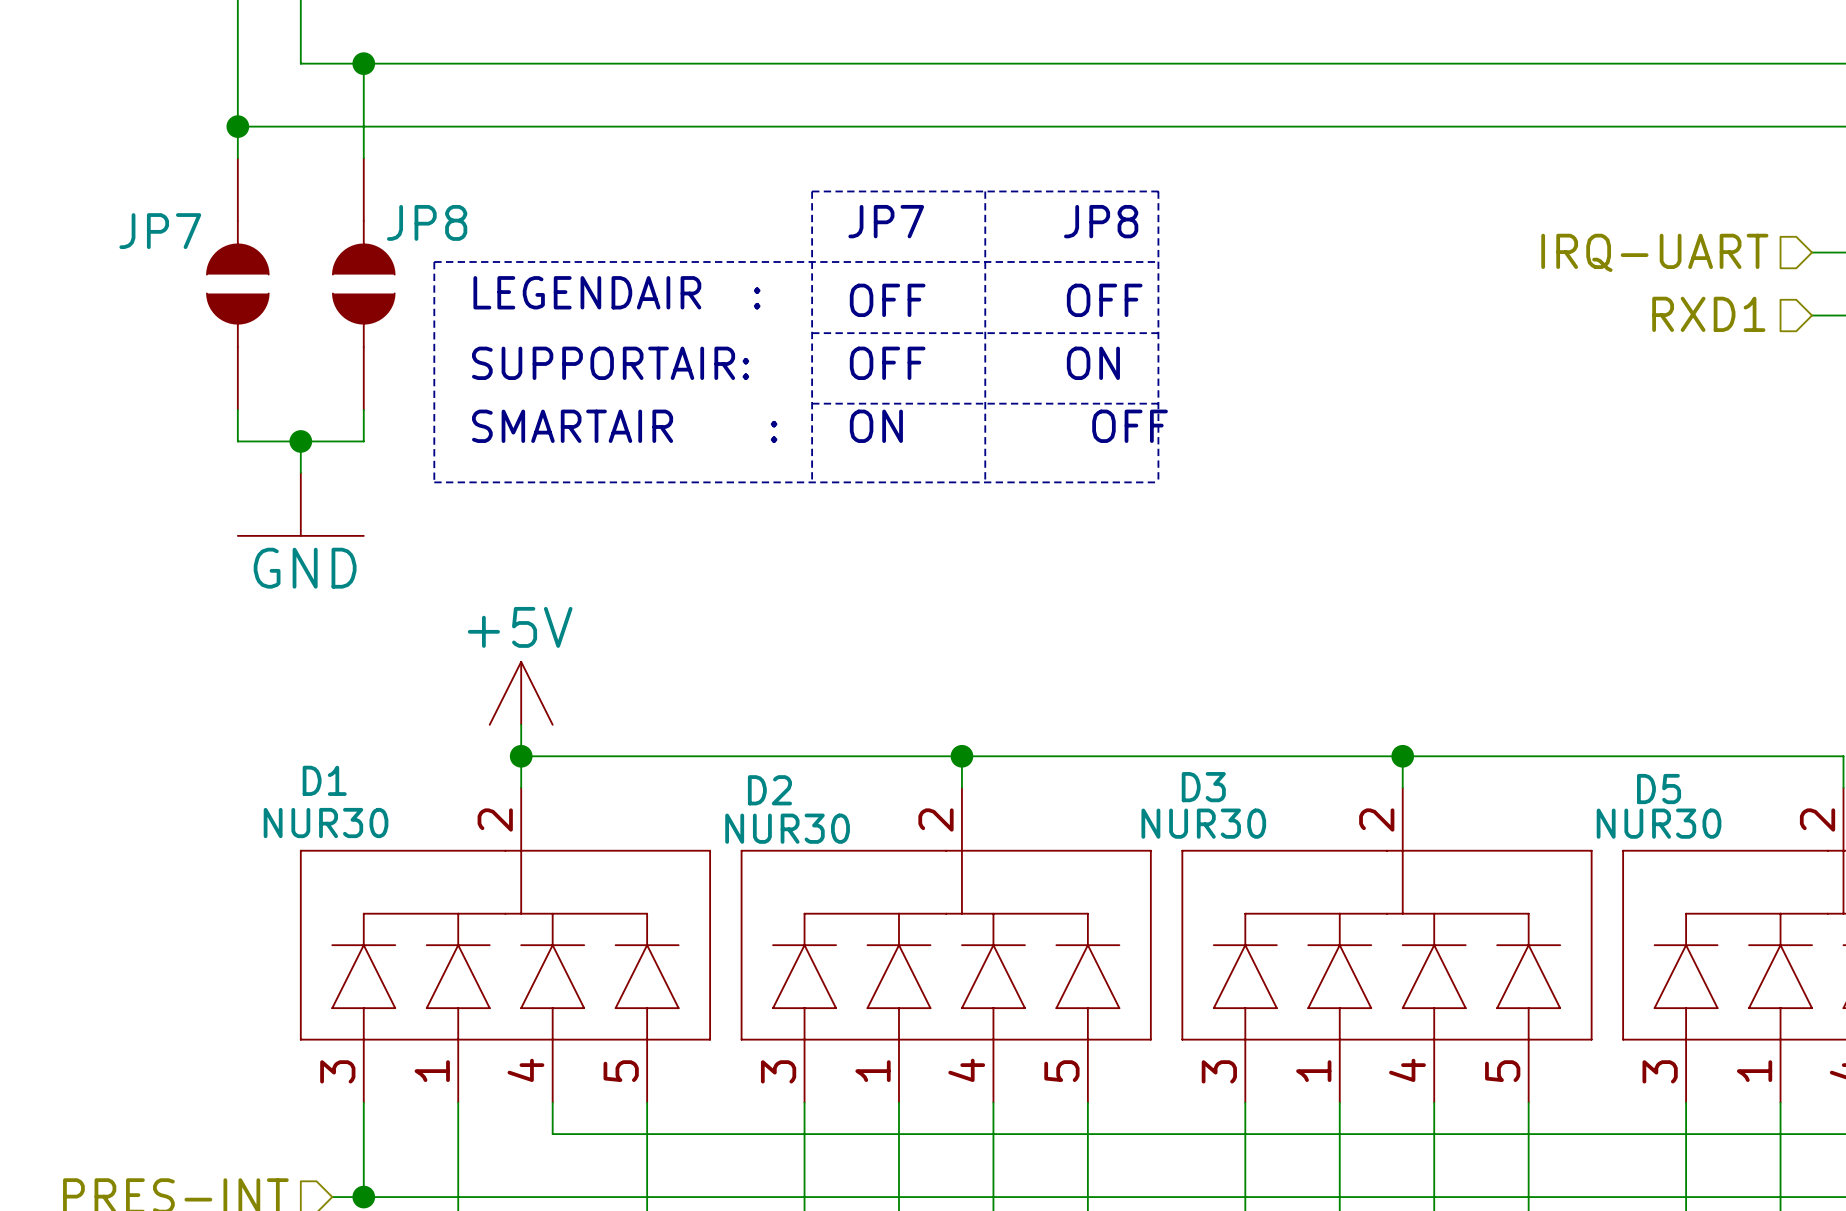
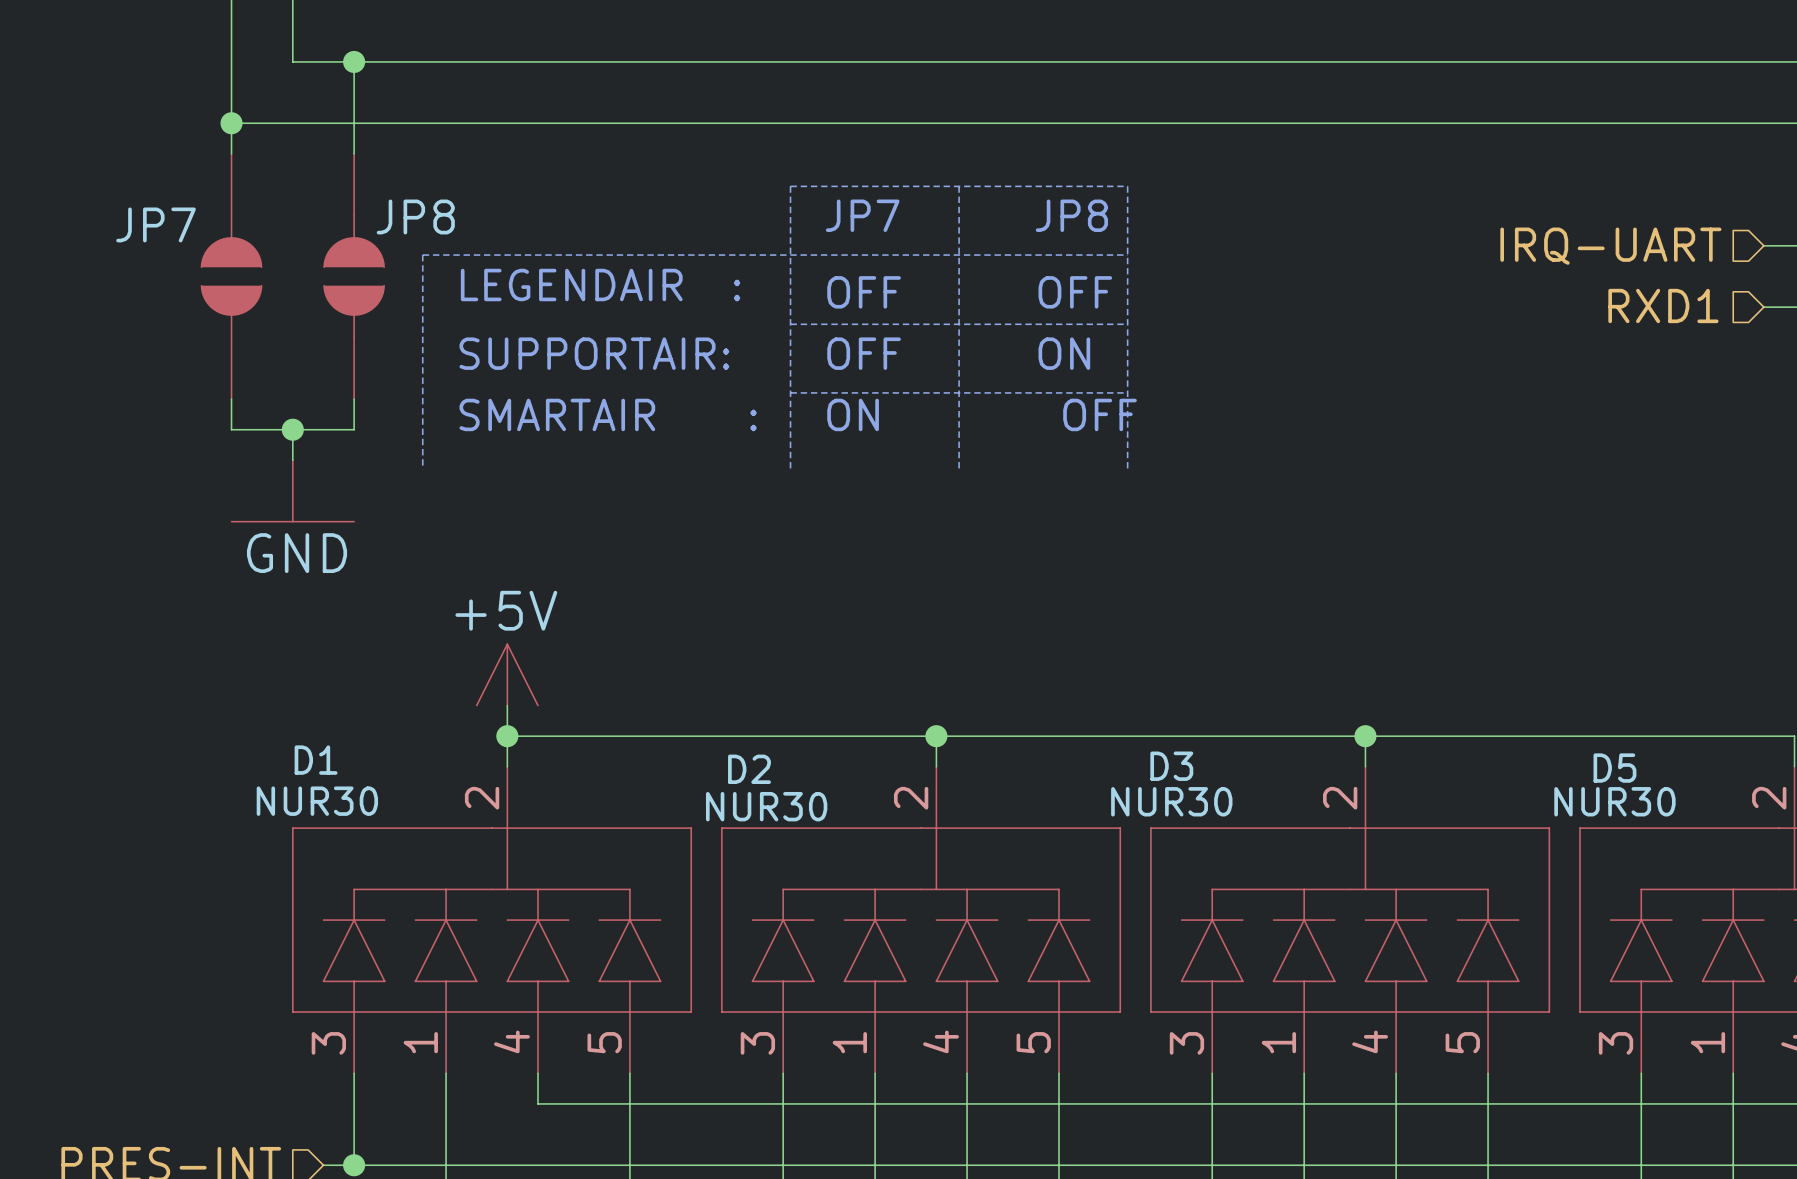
line: (434, 482) (1158, 482) -> none

